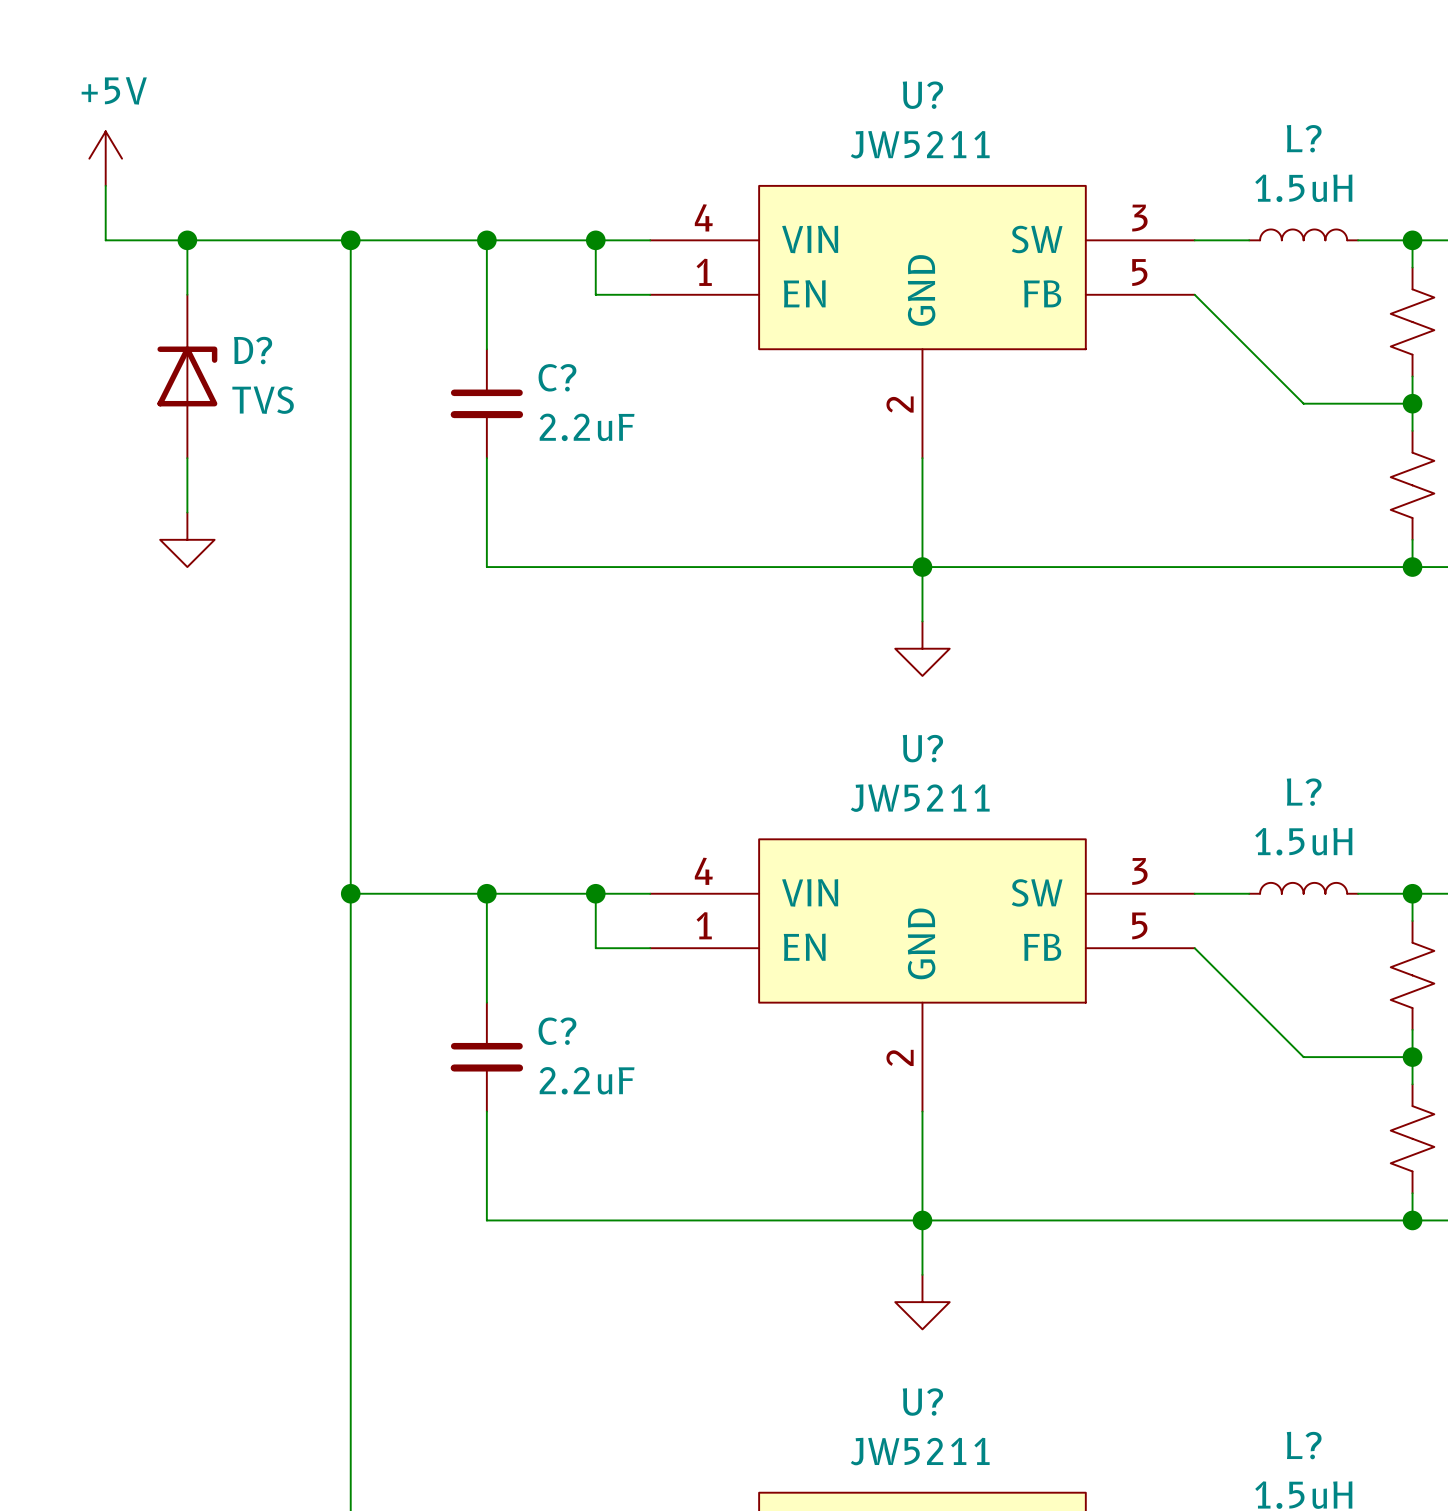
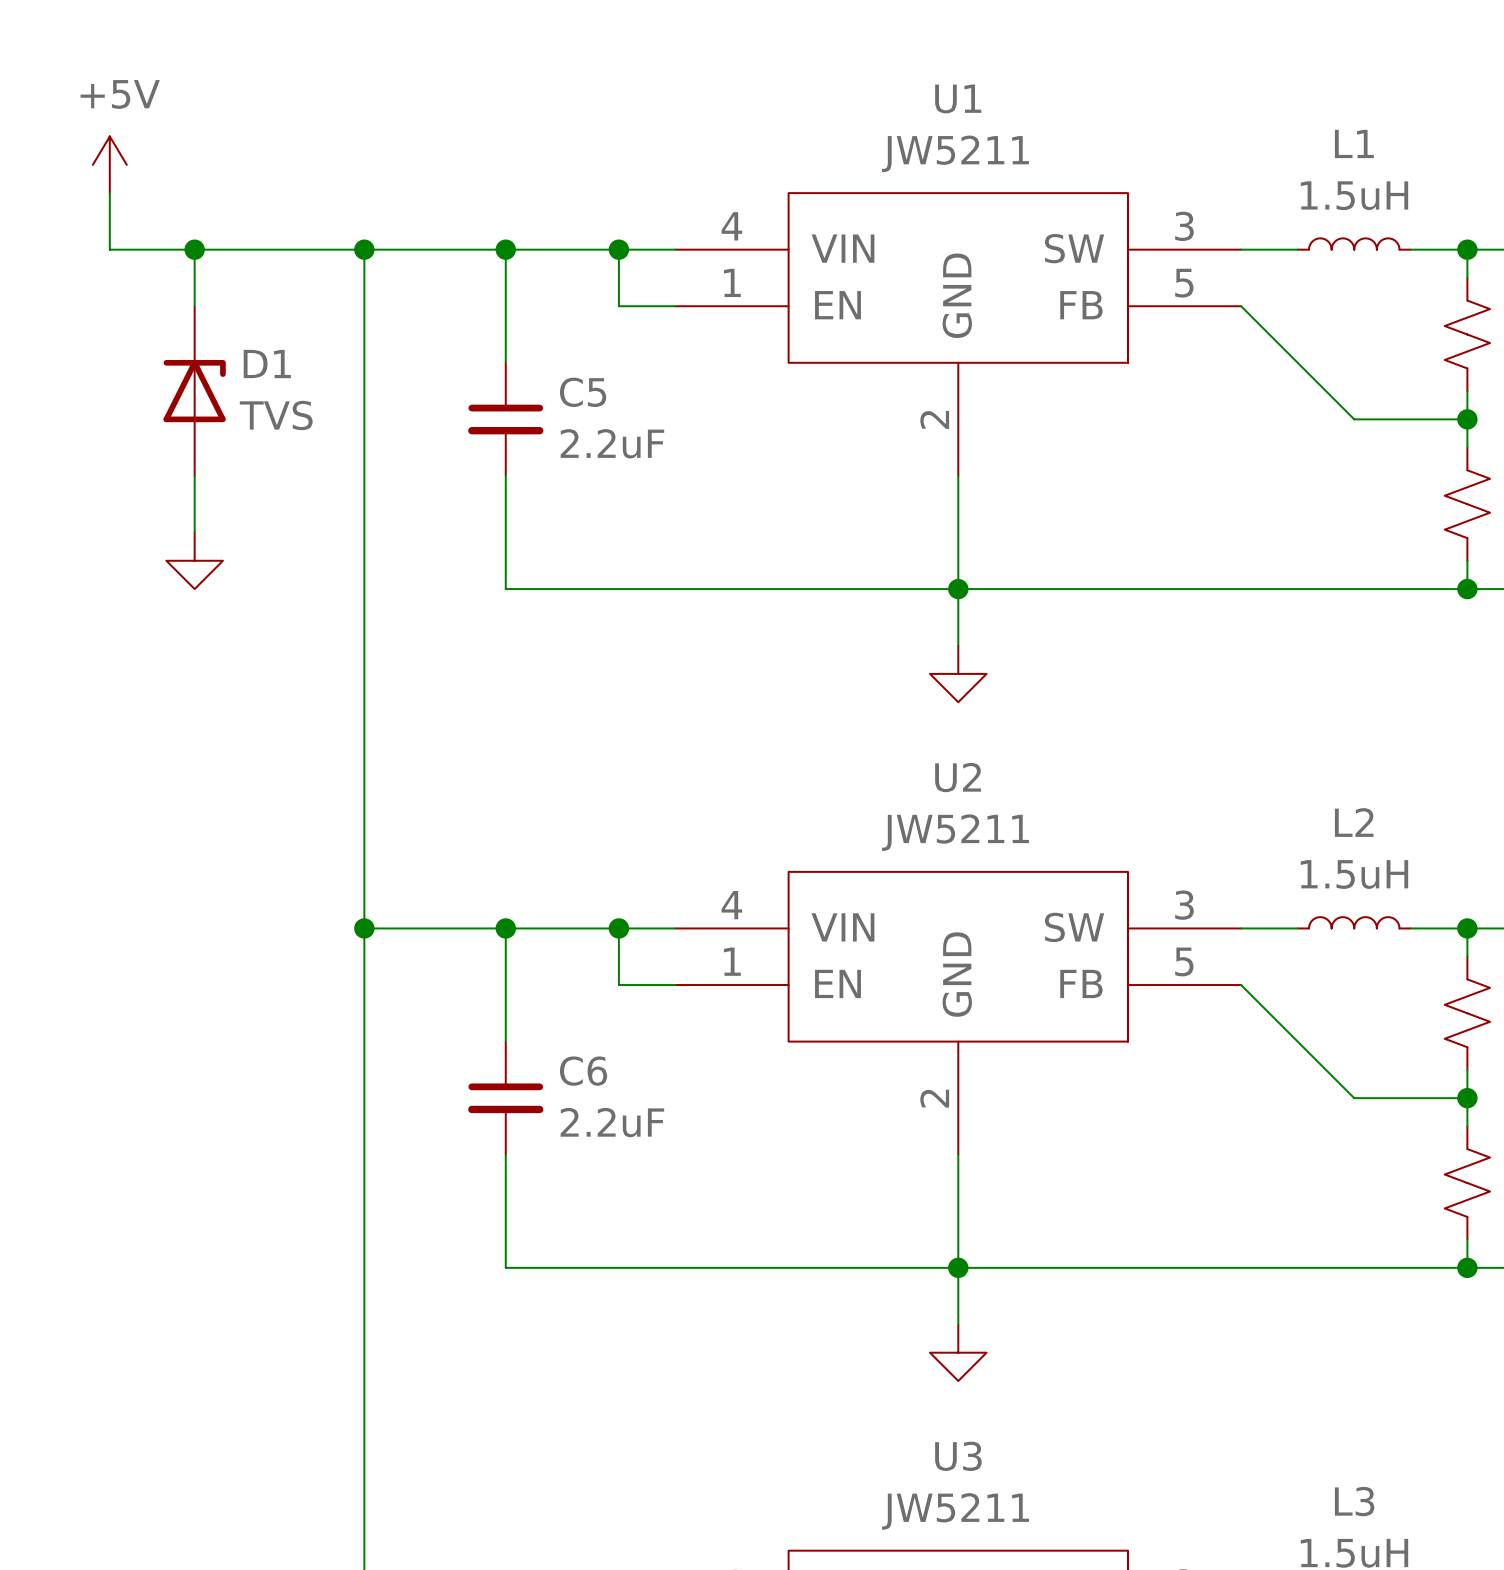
U? name: U? (922, 95) -> U1 (958, 98)
L? name: L? (1304, 138) -> L1 (1354, 143)
D? name: D? (253, 350) -> D1 (267, 364)
C? name: C? (557, 377) -> C5 (583, 392)
U? name: U? (922, 748) -> U2 (958, 777)
L? name: L? (1304, 792) -> L2 (1354, 822)
C? name: C? (557, 1031) -> C6 (583, 1071)
U? name: U? (922, 1402) -> U3 (958, 1456)
L? name: L? (1304, 1445) -> L3 (1354, 1501)

